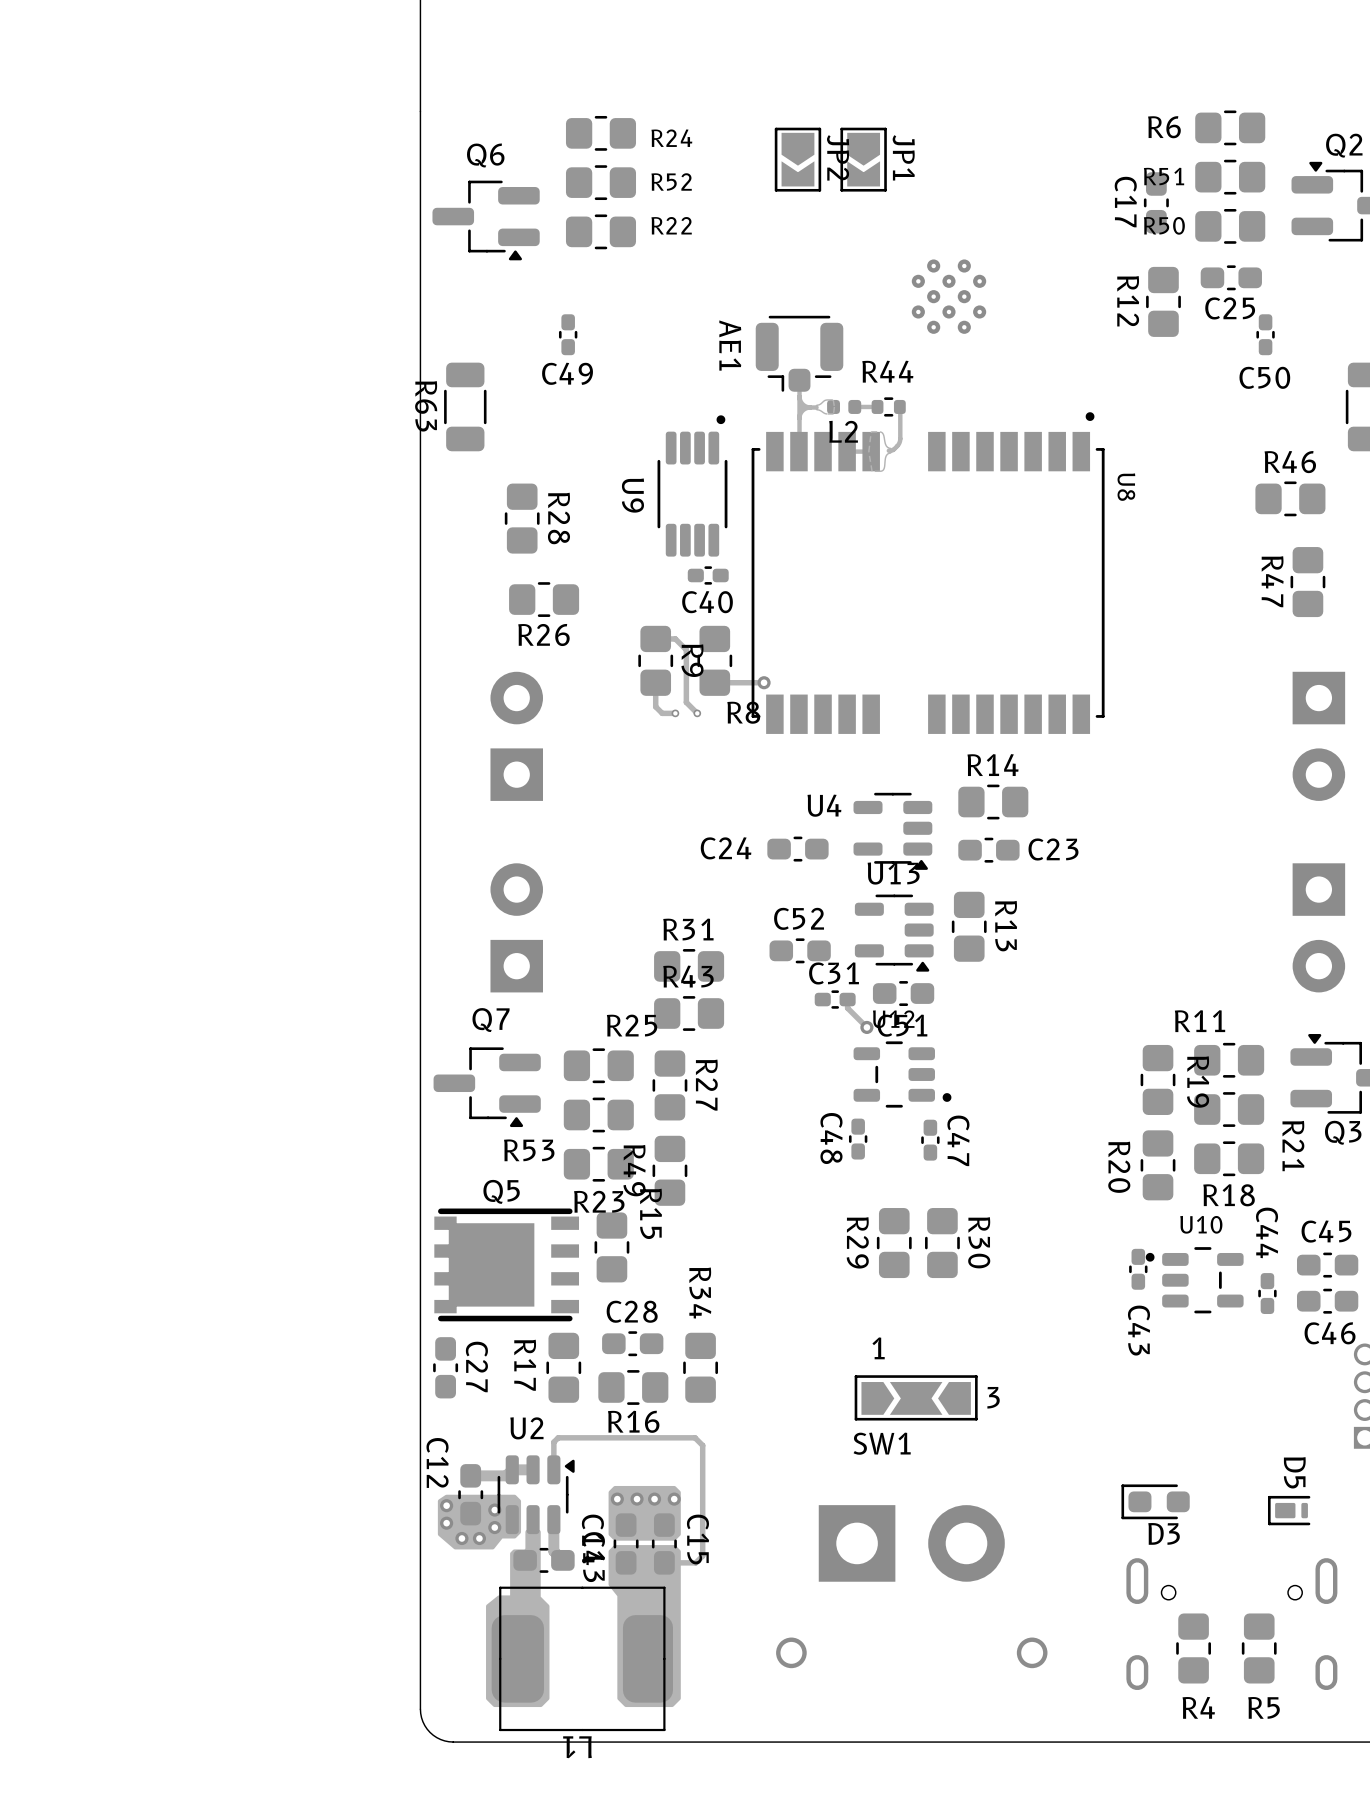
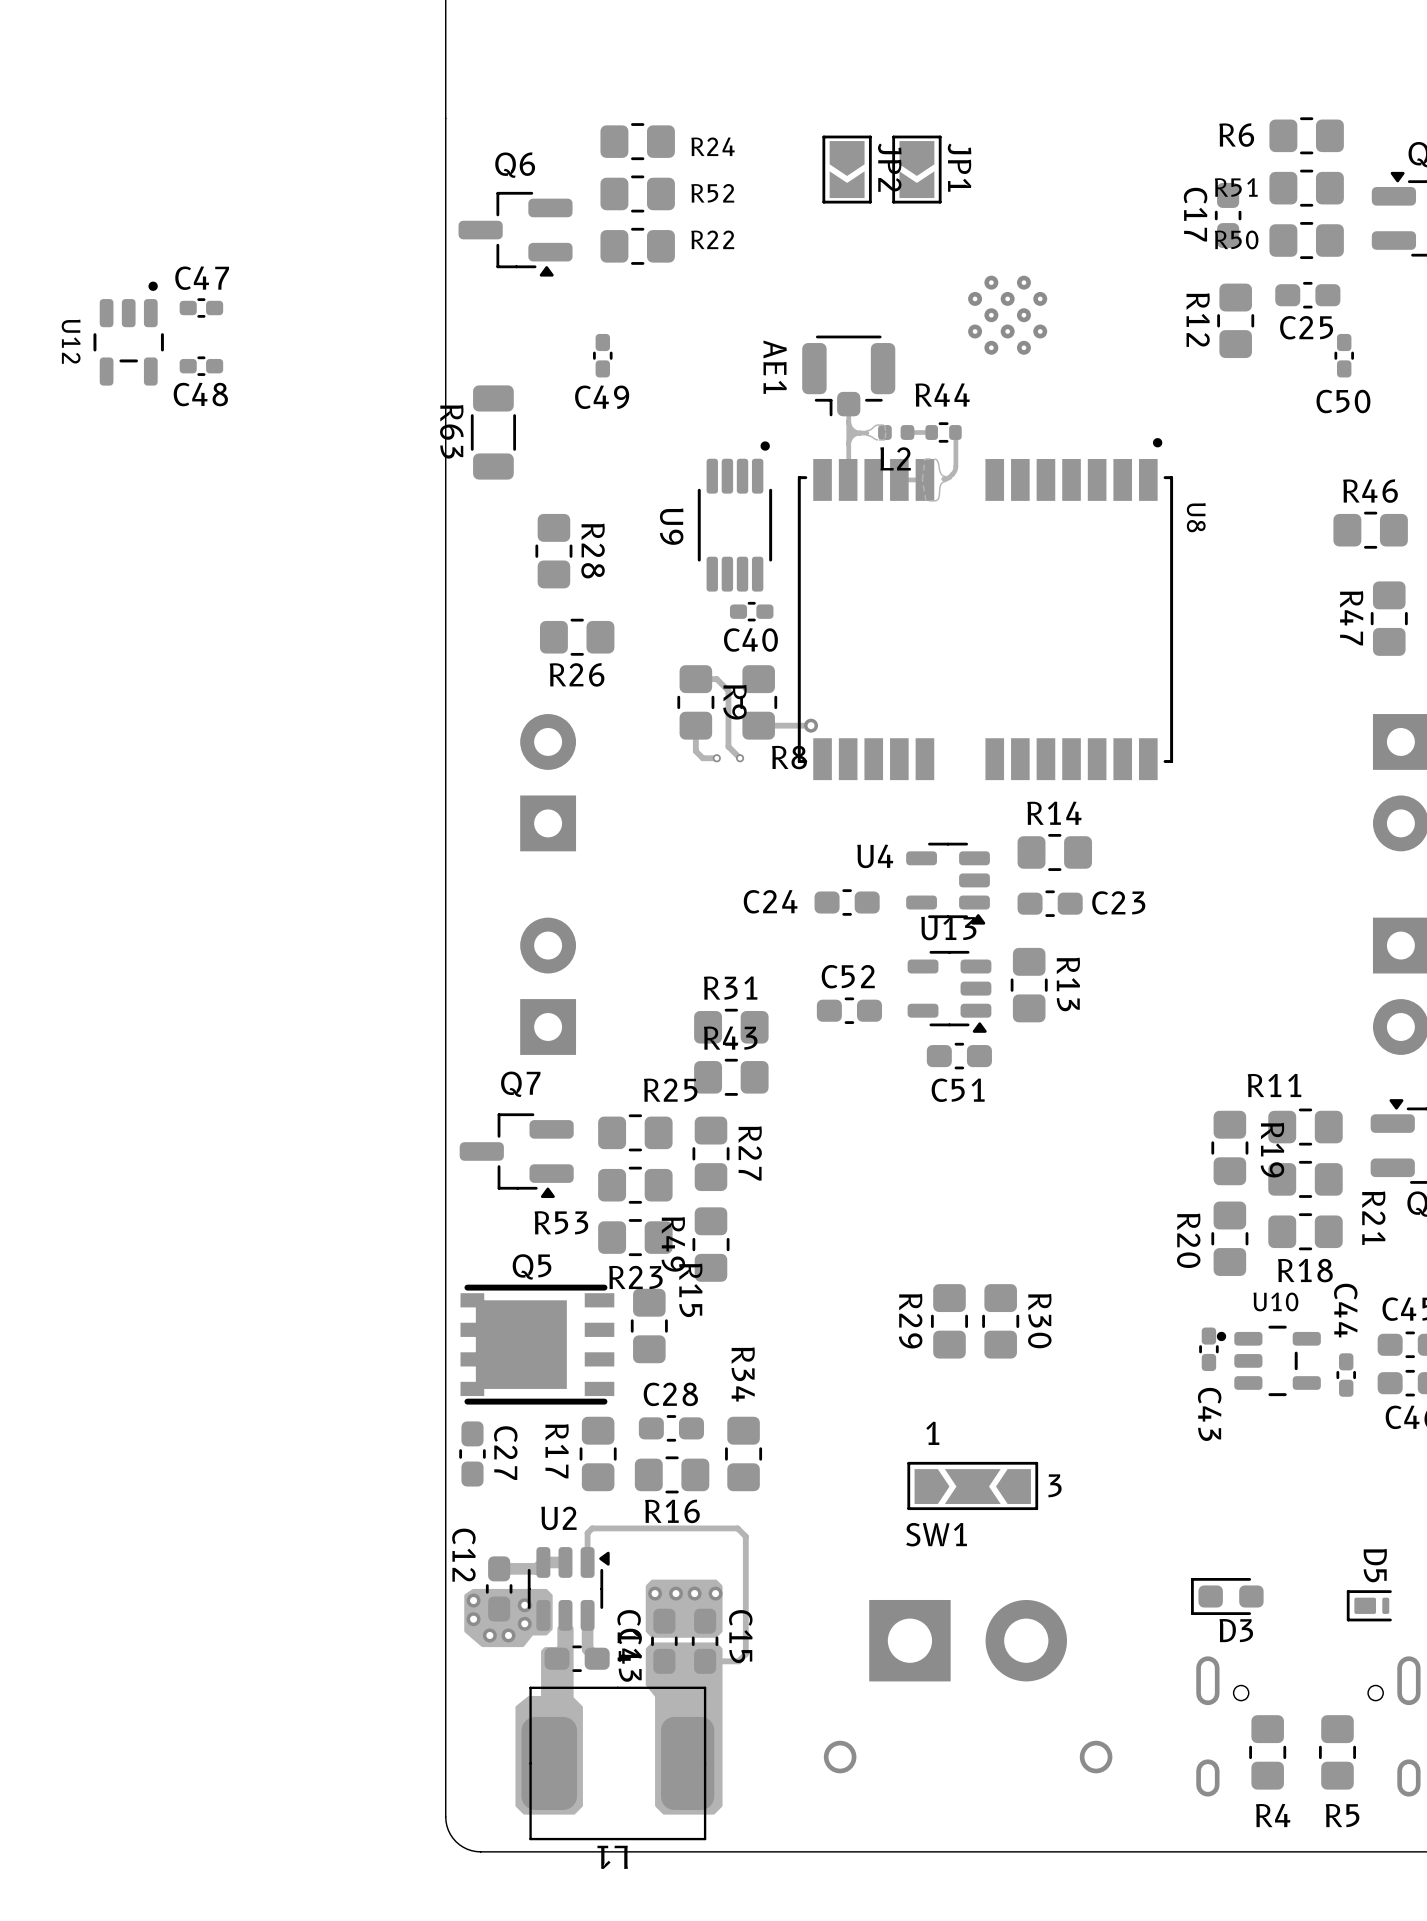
C31: (835, 999) -> none
track: (847, 999) (847, 1008) (866, 1027) -> none
via: (866, 1027) -> none
U12 rotation: 0° (902, 1074) -> 90° counterclockwise (128, 333)
U12 position: (902, 1074) -> (128, 333)
C48 rotation: 0° (858, 1139) -> 90° clockwise (201, 366)
C48 position: (858, 1139) -> (201, 366)
C47 rotation: 0° (930, 1140) -> 90° clockwise (201, 308)
C47 position: (930, 1140) -> (201, 308)

